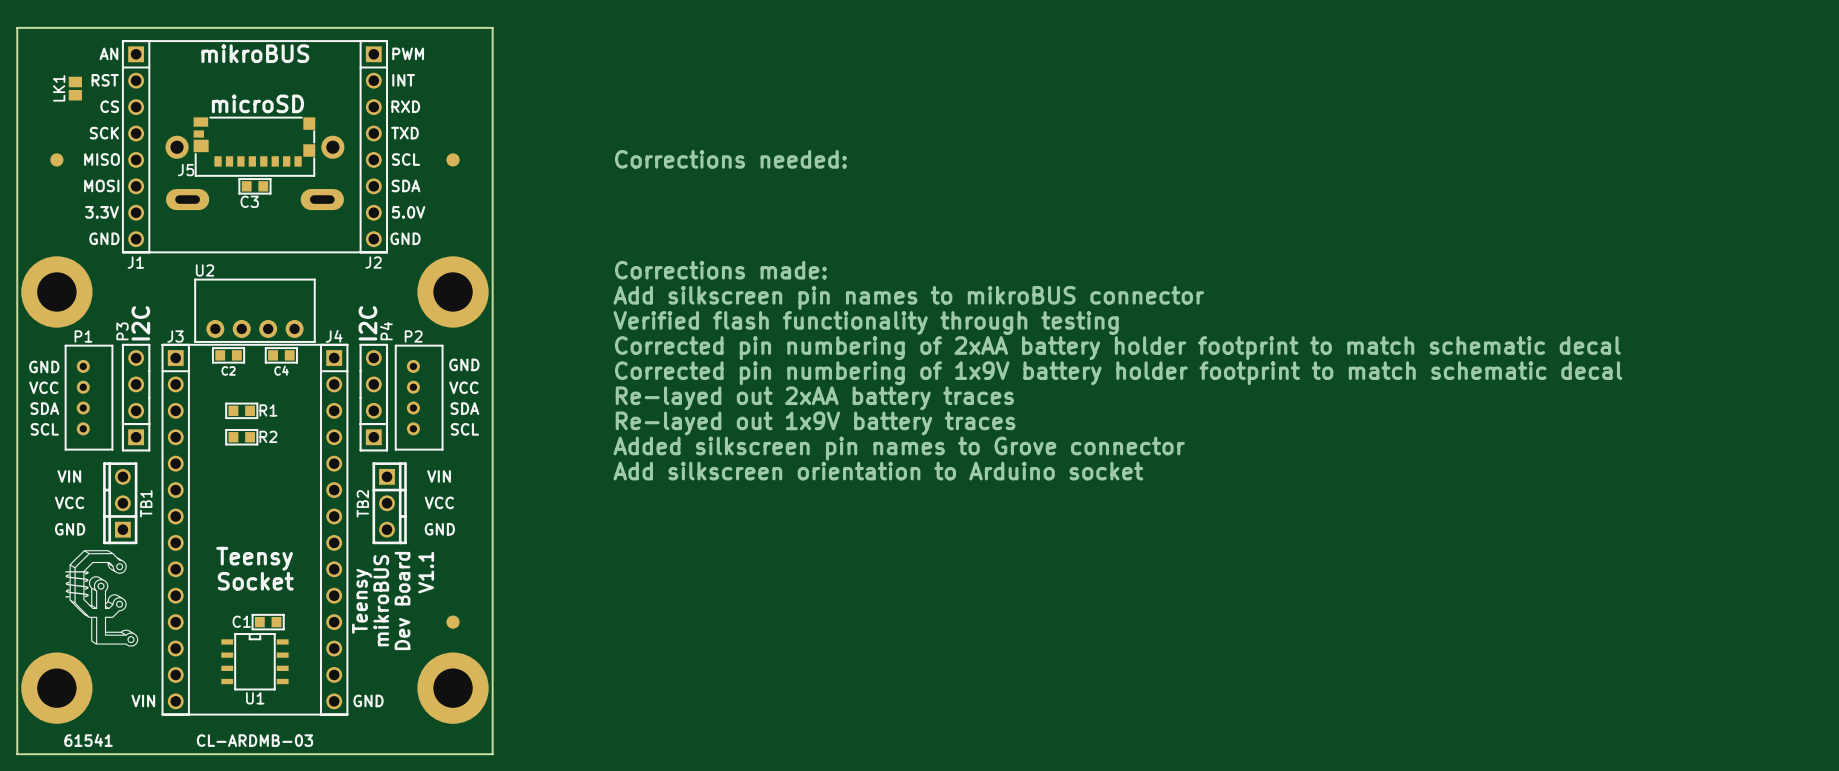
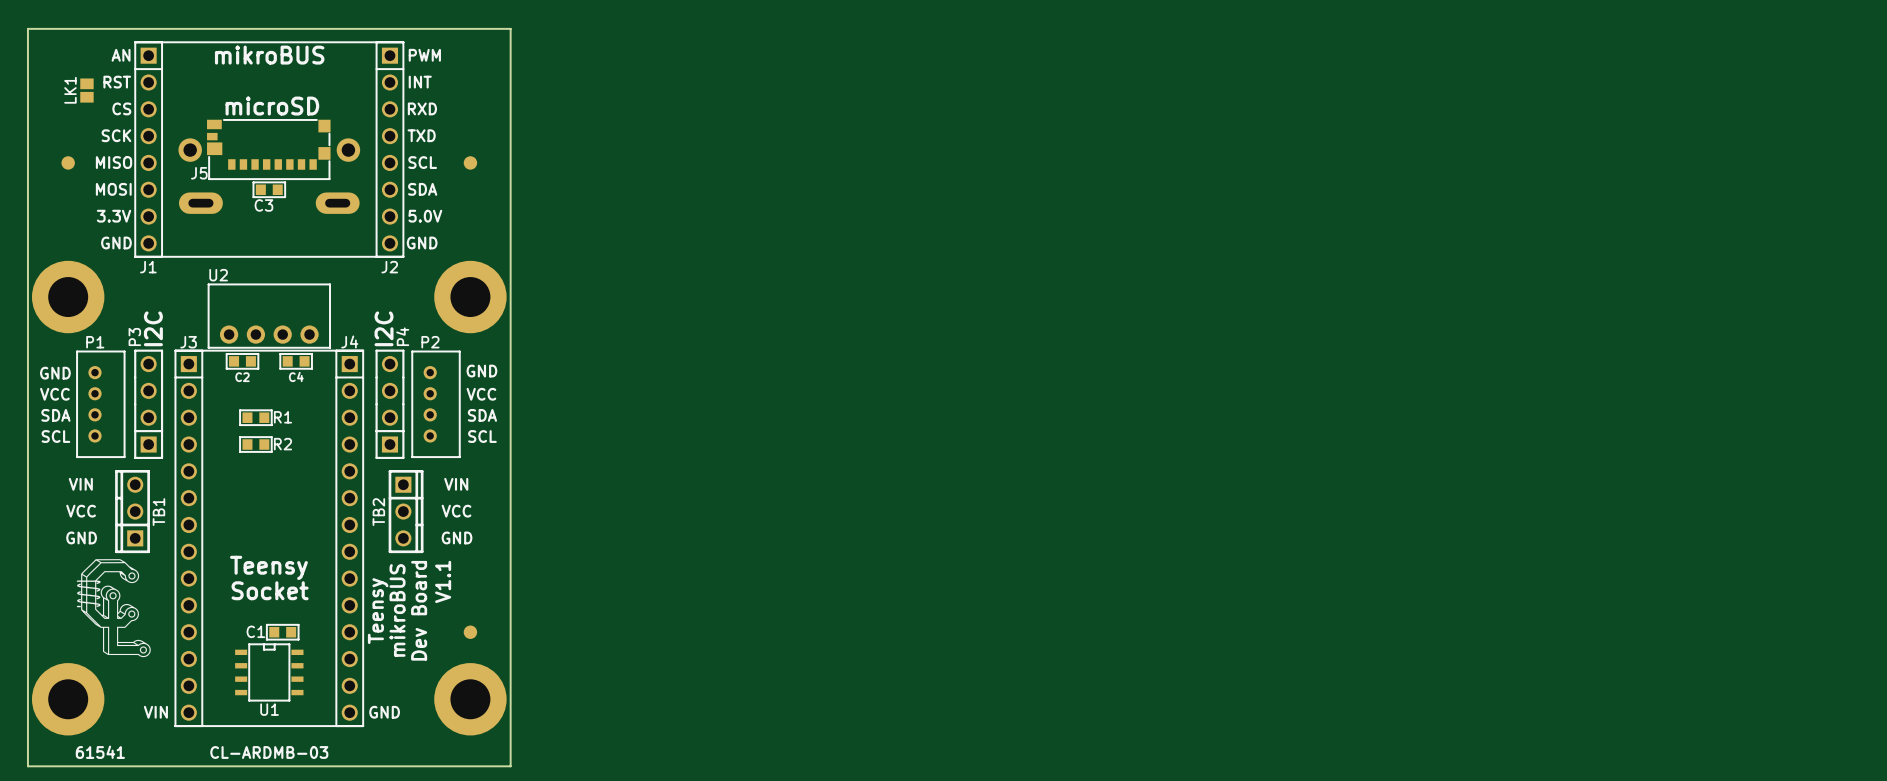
text: Corrections needed: (730, 159) -> none
text: Corrections made: (720, 270) -> none
text: Add silkscreen pin names to mikroBUS connector (908, 297) -> none
text: Verified flash functionality through testing (866, 323) -> none
text: Corrected pin numbering of 2xAA battery holder footprint to match schematic decal (1117, 348) -> none
text: Corrected pin numbering of 1x9V battery holder footprint to match schematic decal (1118, 373) -> none
text: Re-layed out 2xAA battery traces (814, 398) -> none
text: Re-layed out 1x9V battery traces (815, 423) -> none
text: Added silkscreen pin names to Grove connector (899, 448) -> none
text: Add silkscreen orientation to Arduino socket (878, 471) -> none

